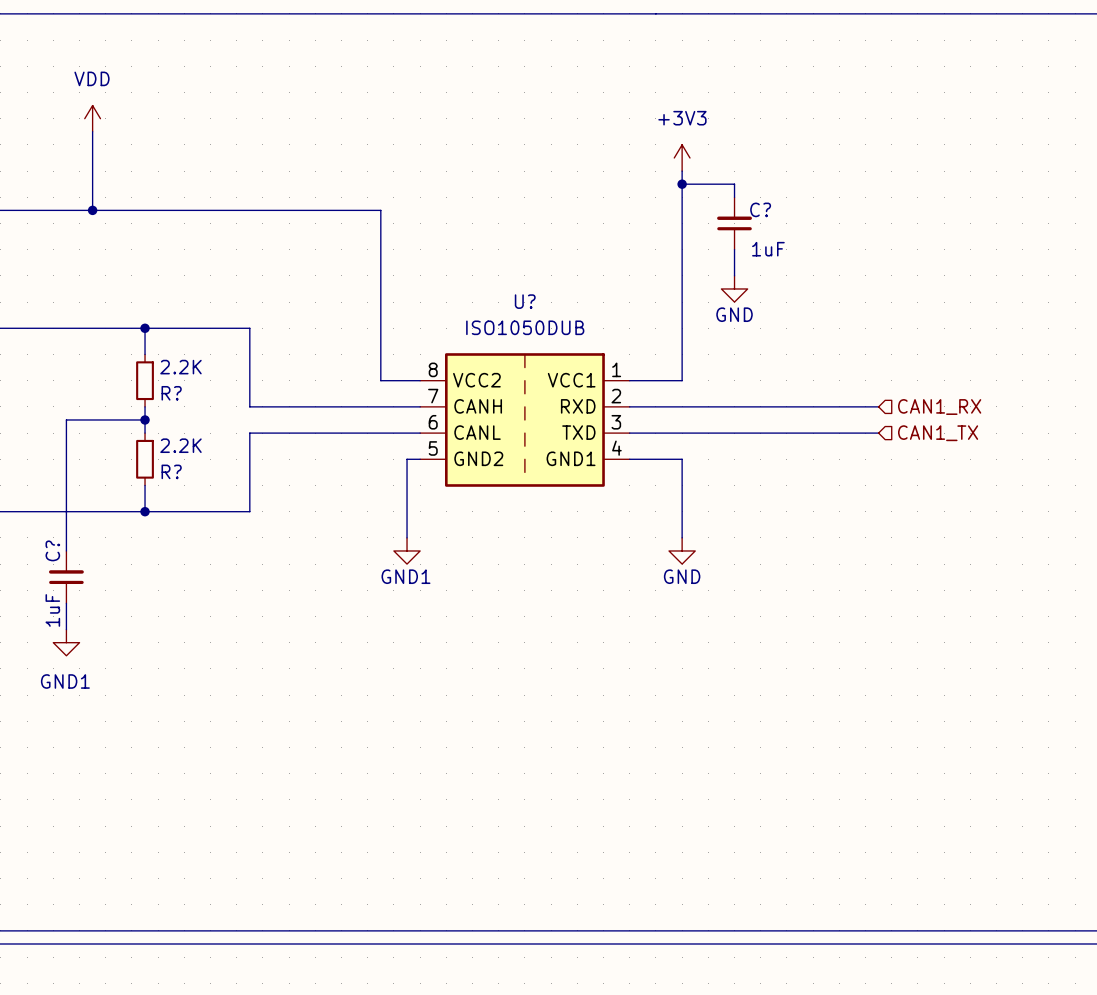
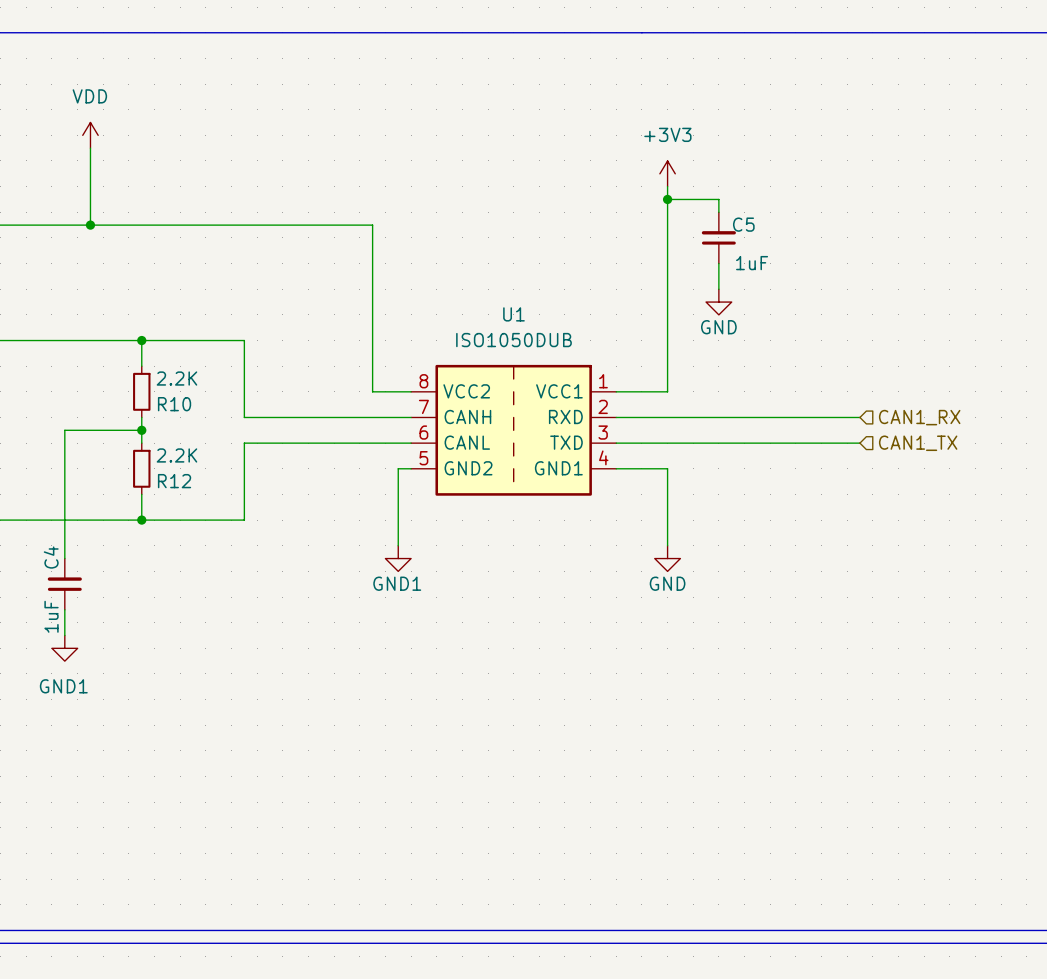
C? name: C? (760, 209) -> C5 (743, 224)
U? name: U? (525, 301) -> U1 (513, 314)
R? name: R? (171, 393) -> R10 (174, 404)
R? name: R? (171, 471) -> R12 (174, 481)
C? name: C? (52, 550) -> C4 (51, 557)

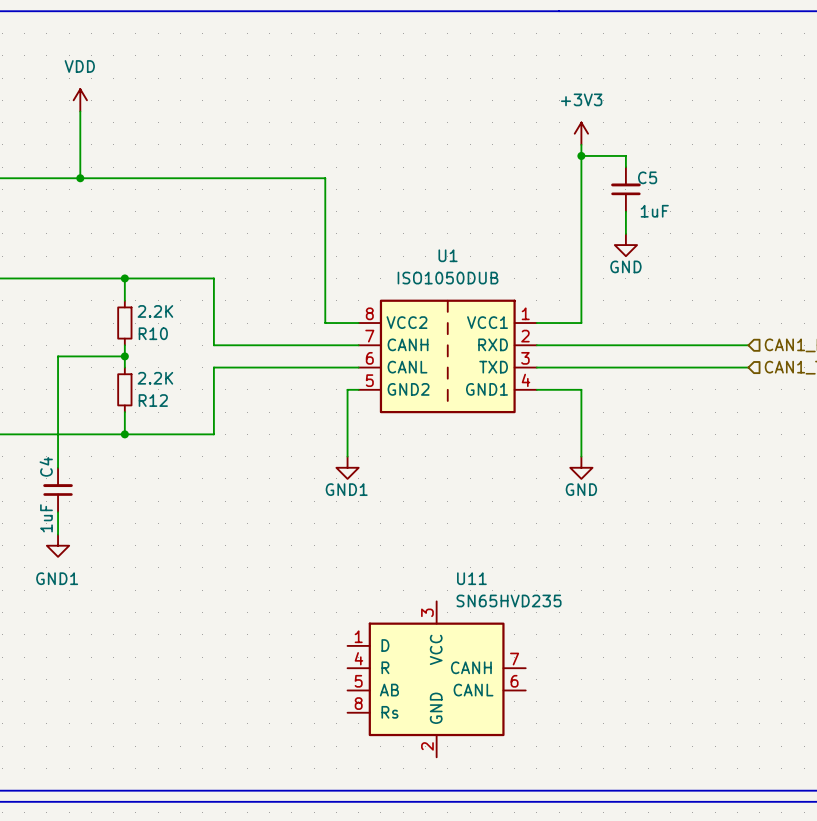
U11: none -> SN65HVD235 (436, 679)

